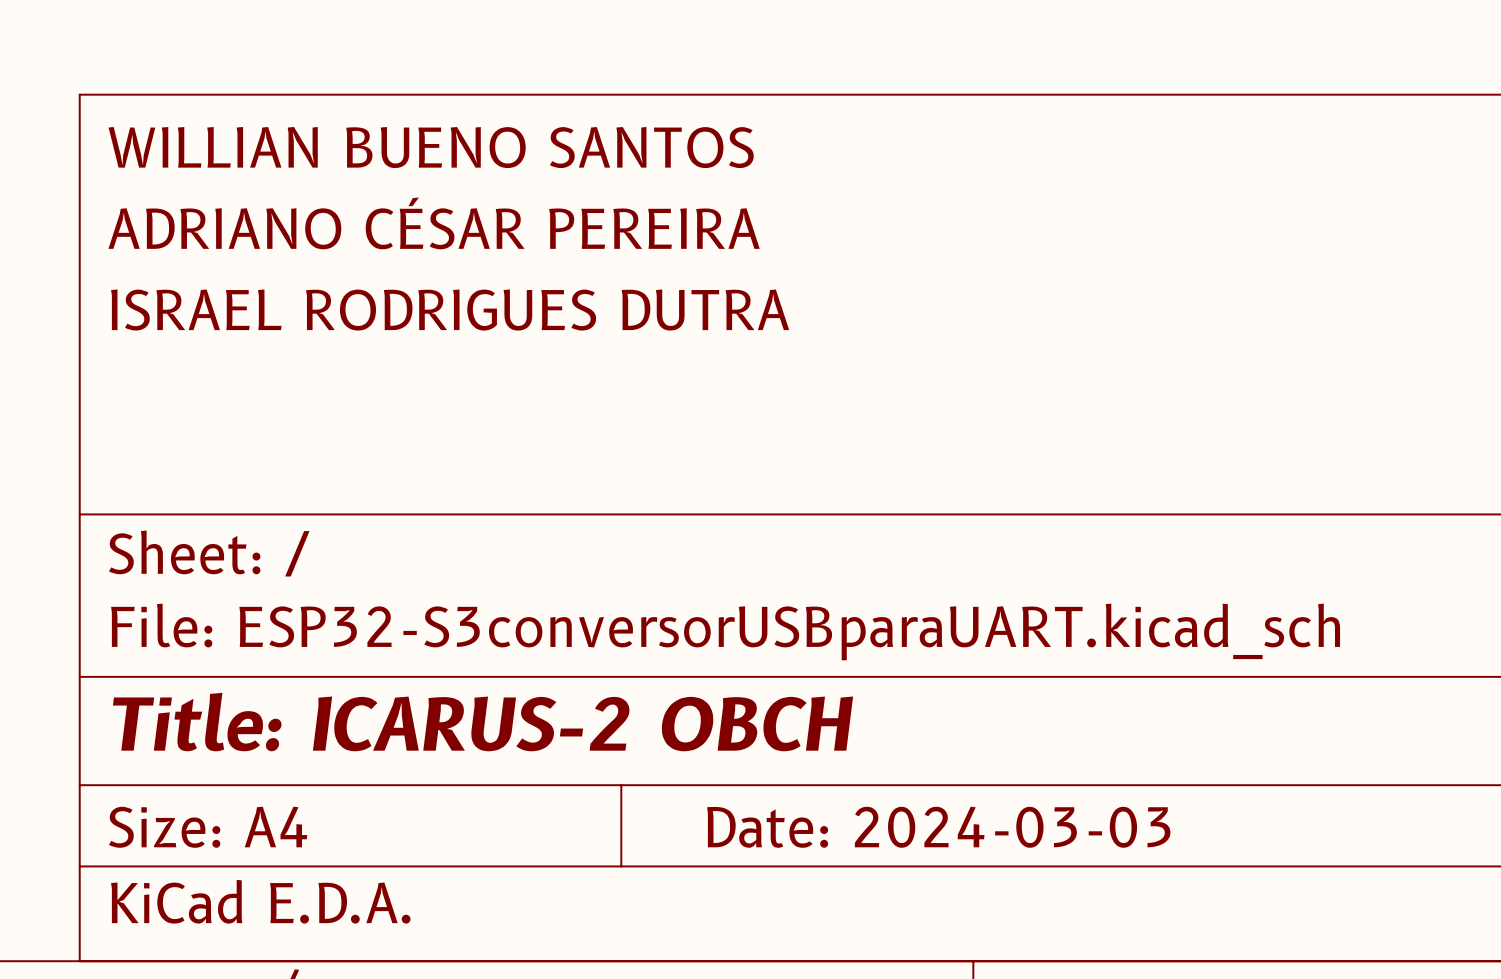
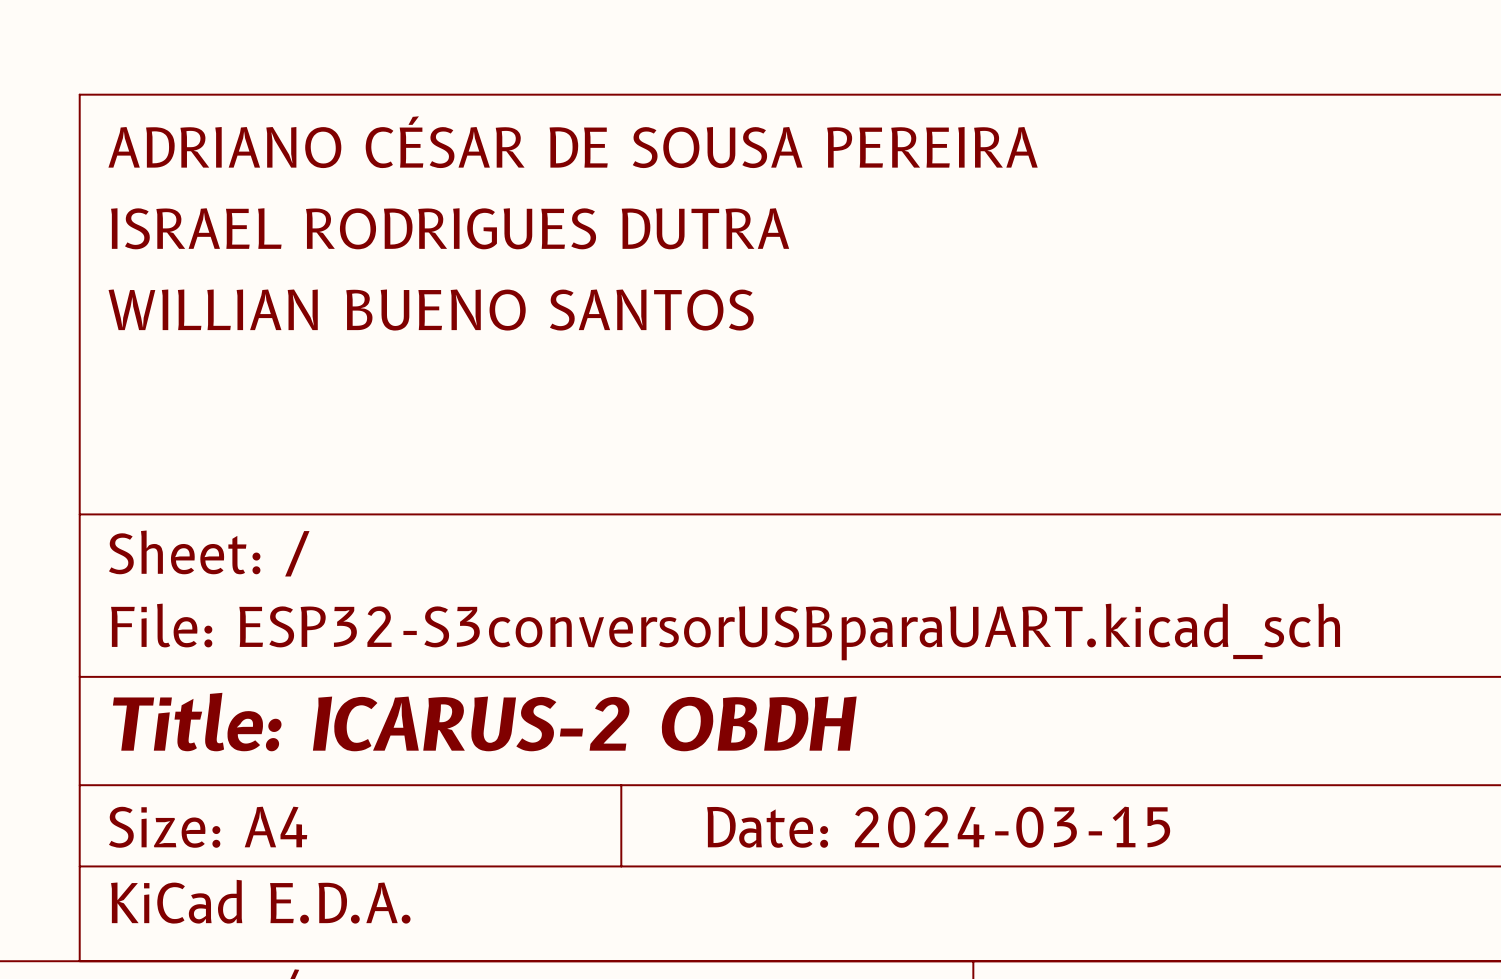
title block: WILLIAN BUENO SANTOS (431, 147) -> ADRIANO CÉSAR DE SOUSA PEREIRA (573, 142)
title block: ADRIANO CÉSAR PEREIRA (434, 223) -> ISRAEL RODRIGUES DUTRA (450, 228)
title block: ISRAEL RODRIGUES DUTRA (450, 310) -> WILLIAN BUENO SANTOS (431, 310)
title block: Title: ICARUS-2 OBCH (483, 722) -> Title: ICARUS-2 OBDH (484, 722)
title block: Date: 2024-03-03 (938, 827) -> Date: 2024-03-15 (938, 827)

